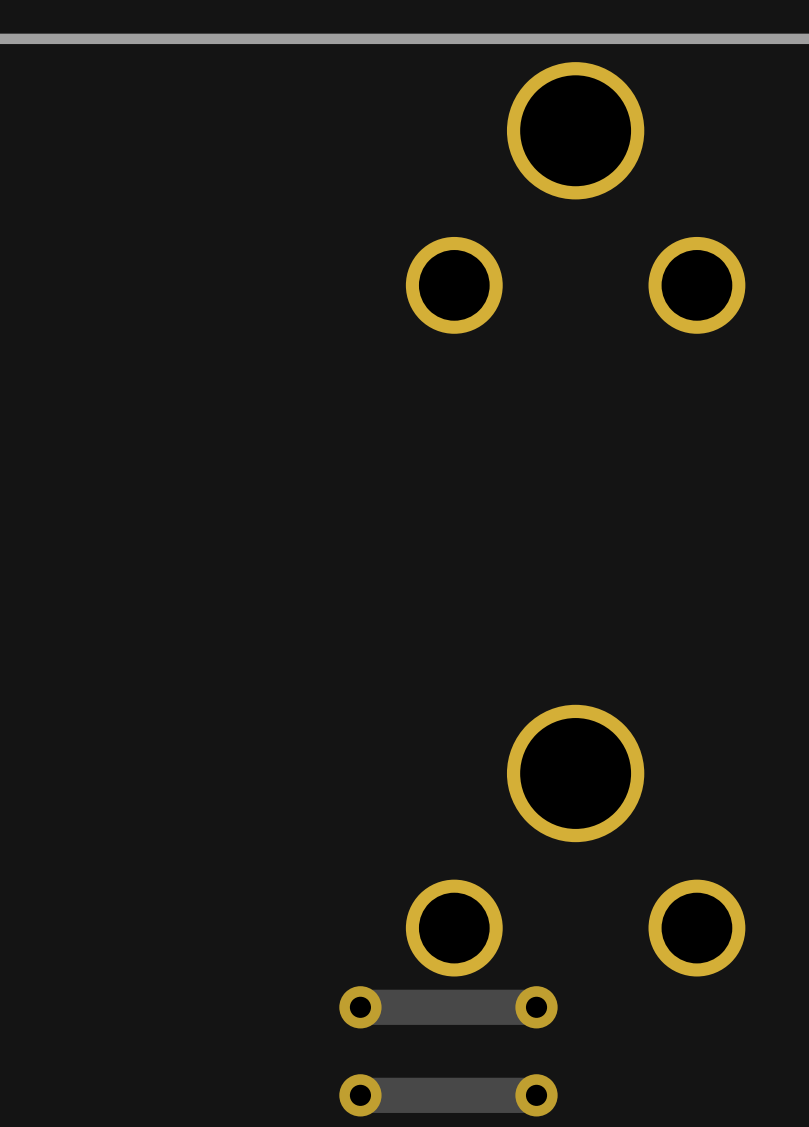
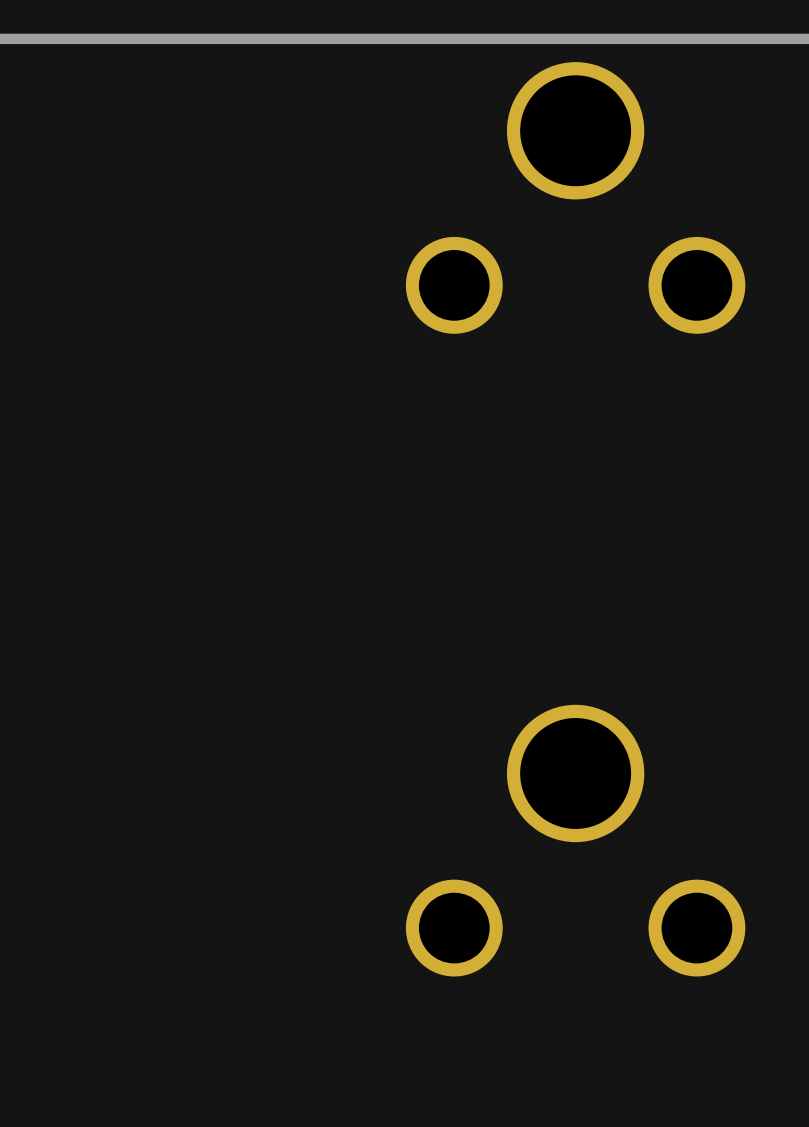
via: (360, 1007) -> none
track: (536, 1007) (360, 1007) -> none
via: (536, 1007) -> none
via: (360, 1095) -> none
track: (536, 1095) (360, 1095) -> none
via: (536, 1095) -> none

